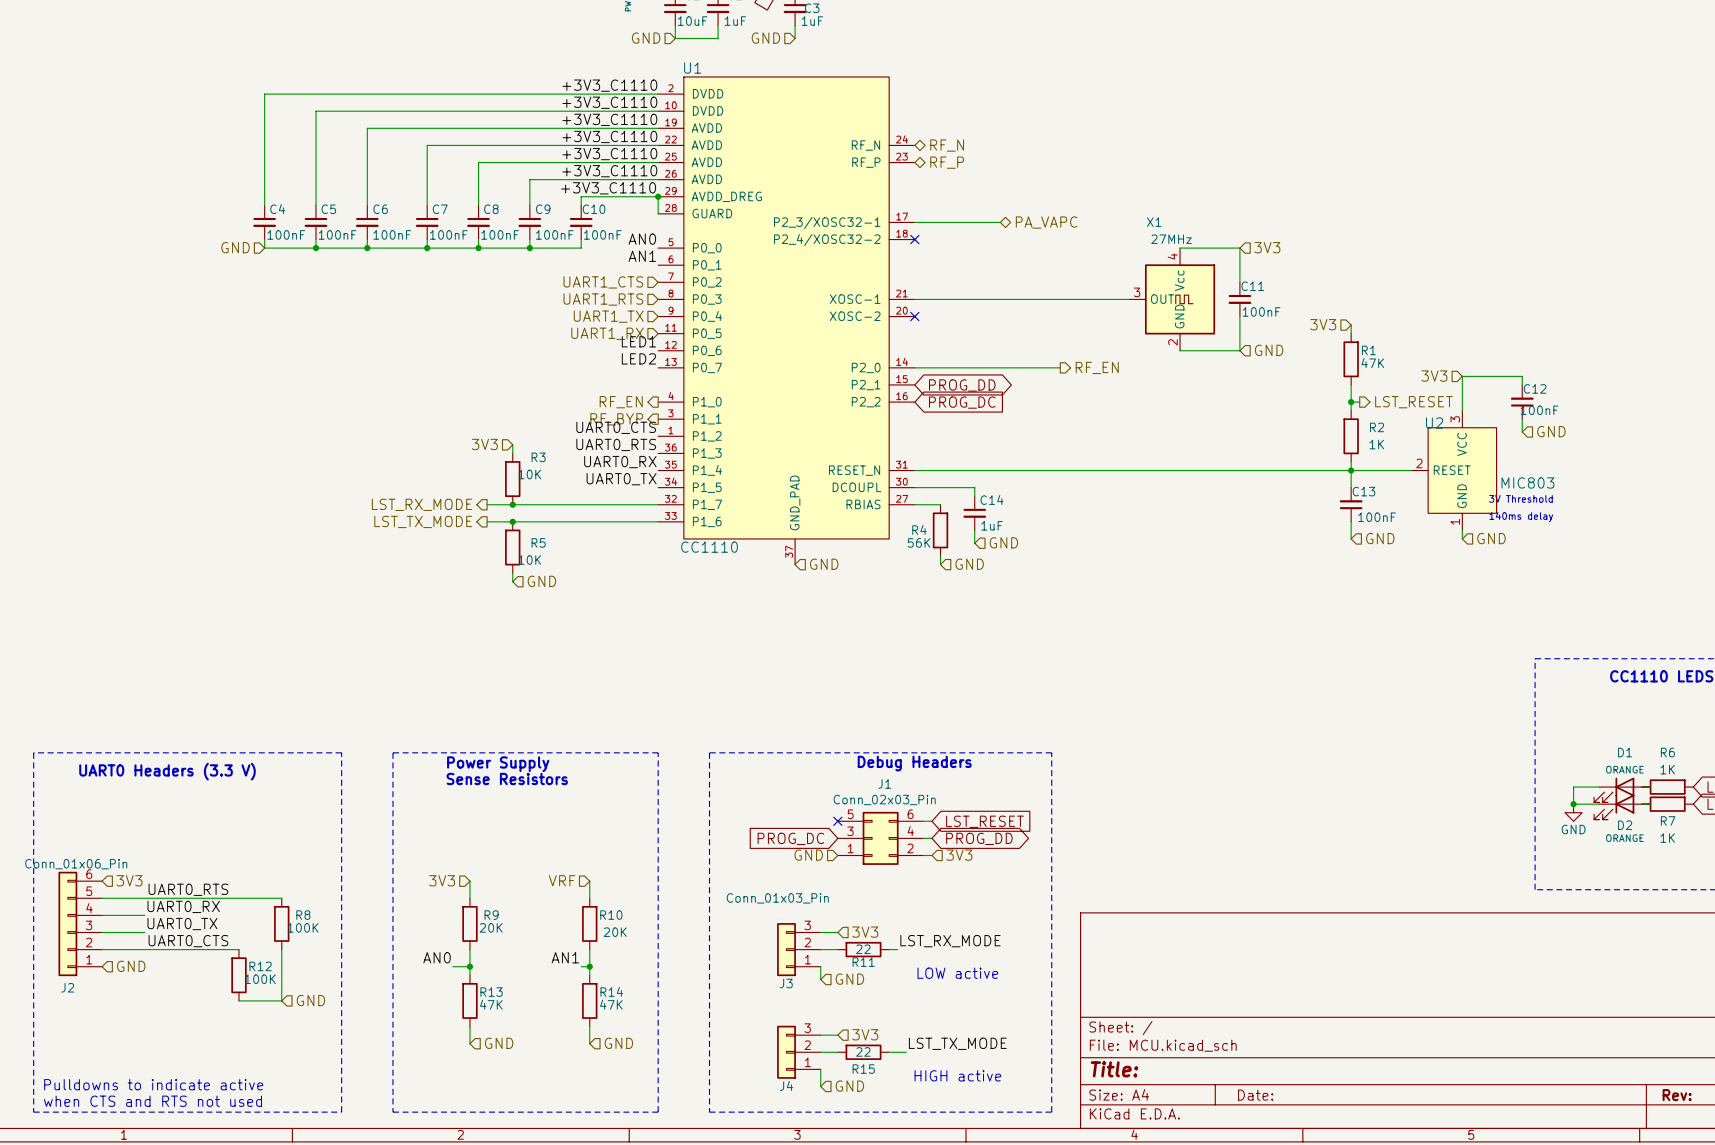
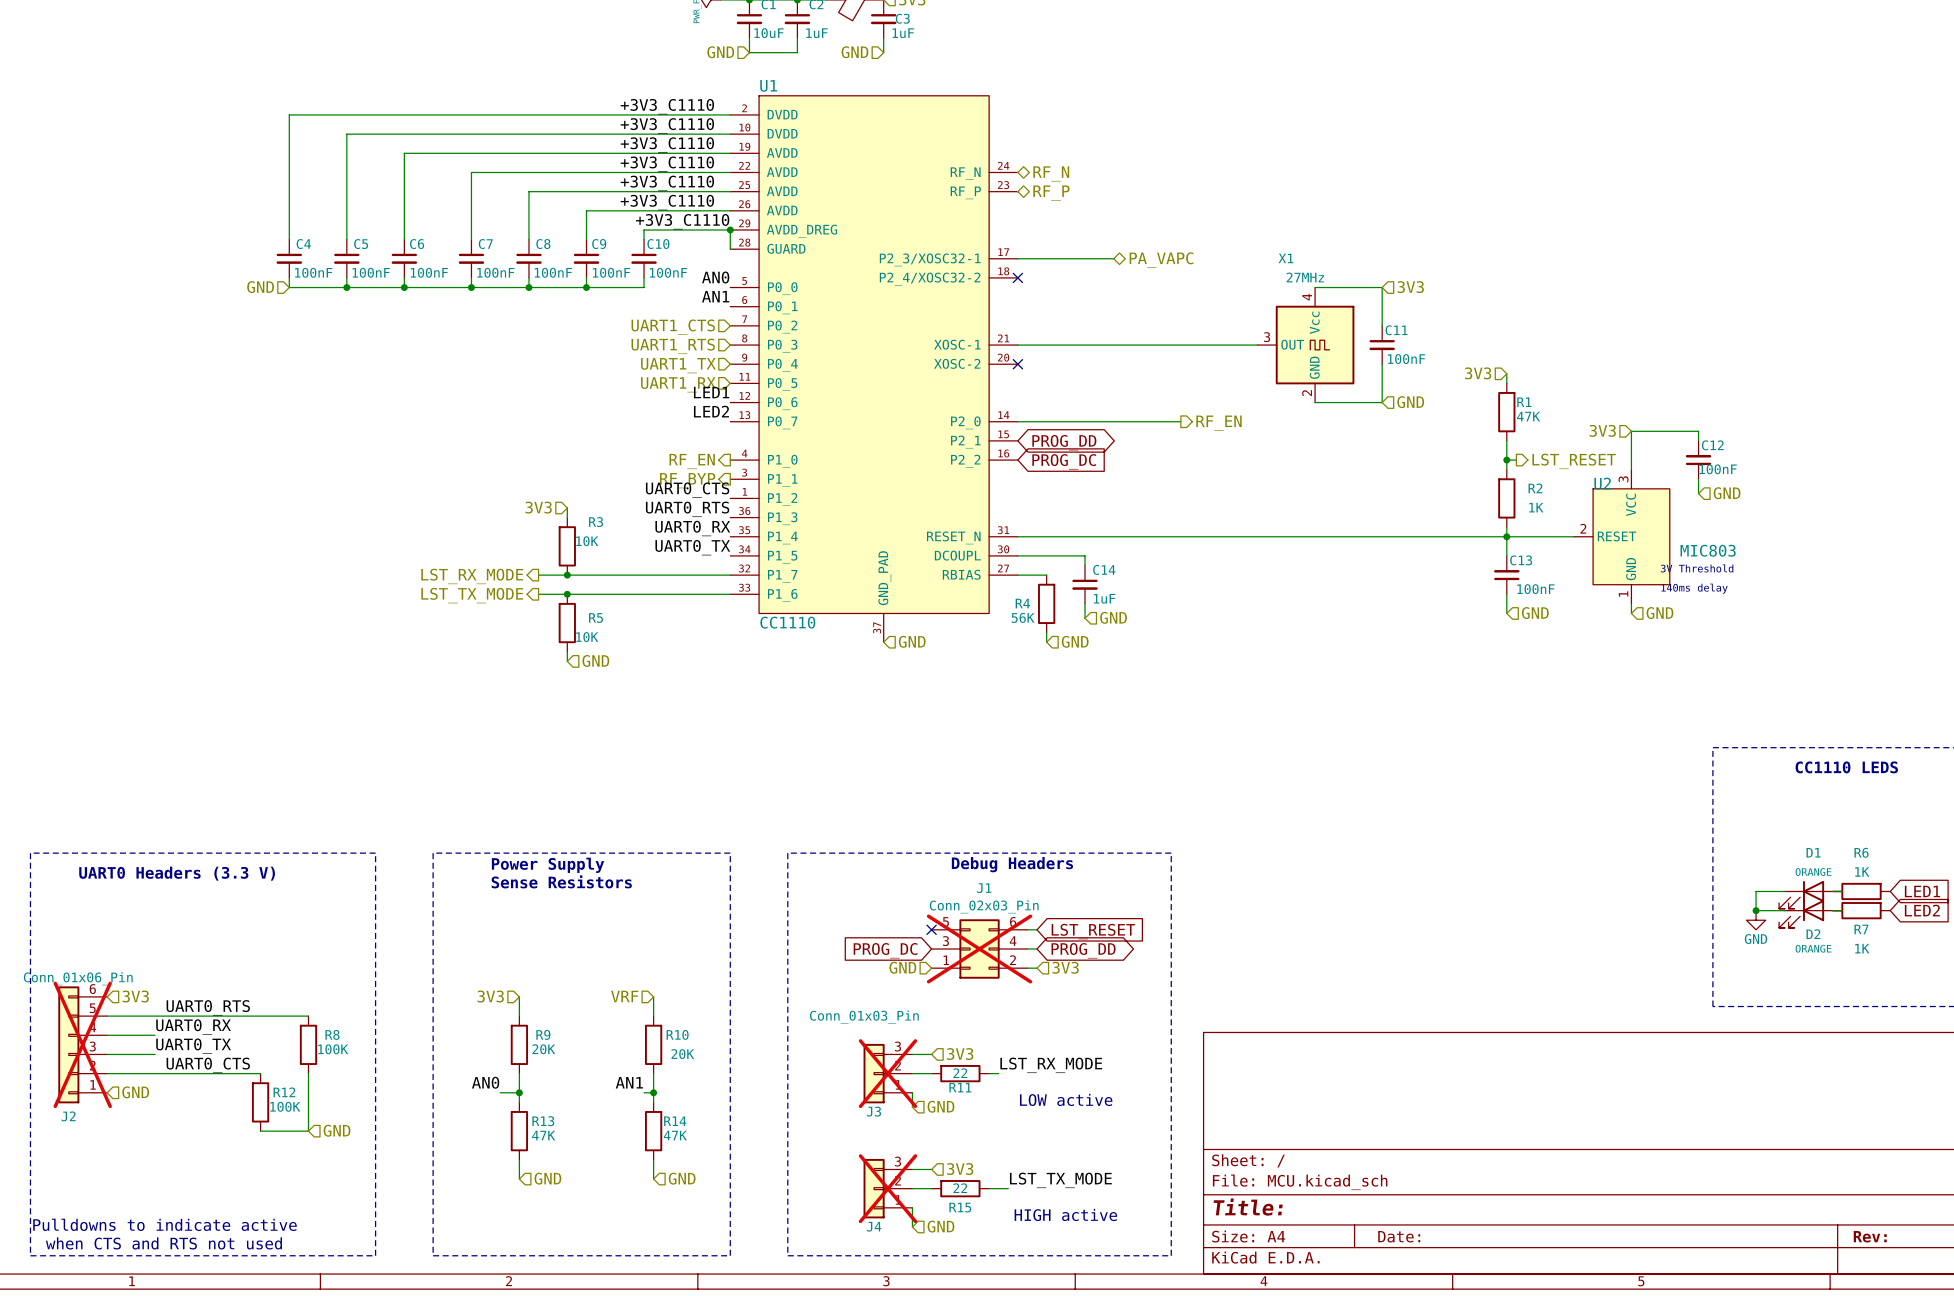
J1 do-not-place cross: none -> (979, 948)
J2 do-not-place cross: none -> (82, 1044)
J3 do-not-place cross: none -> (887, 1073)
J4 do-not-place cross: none -> (887, 1188)

